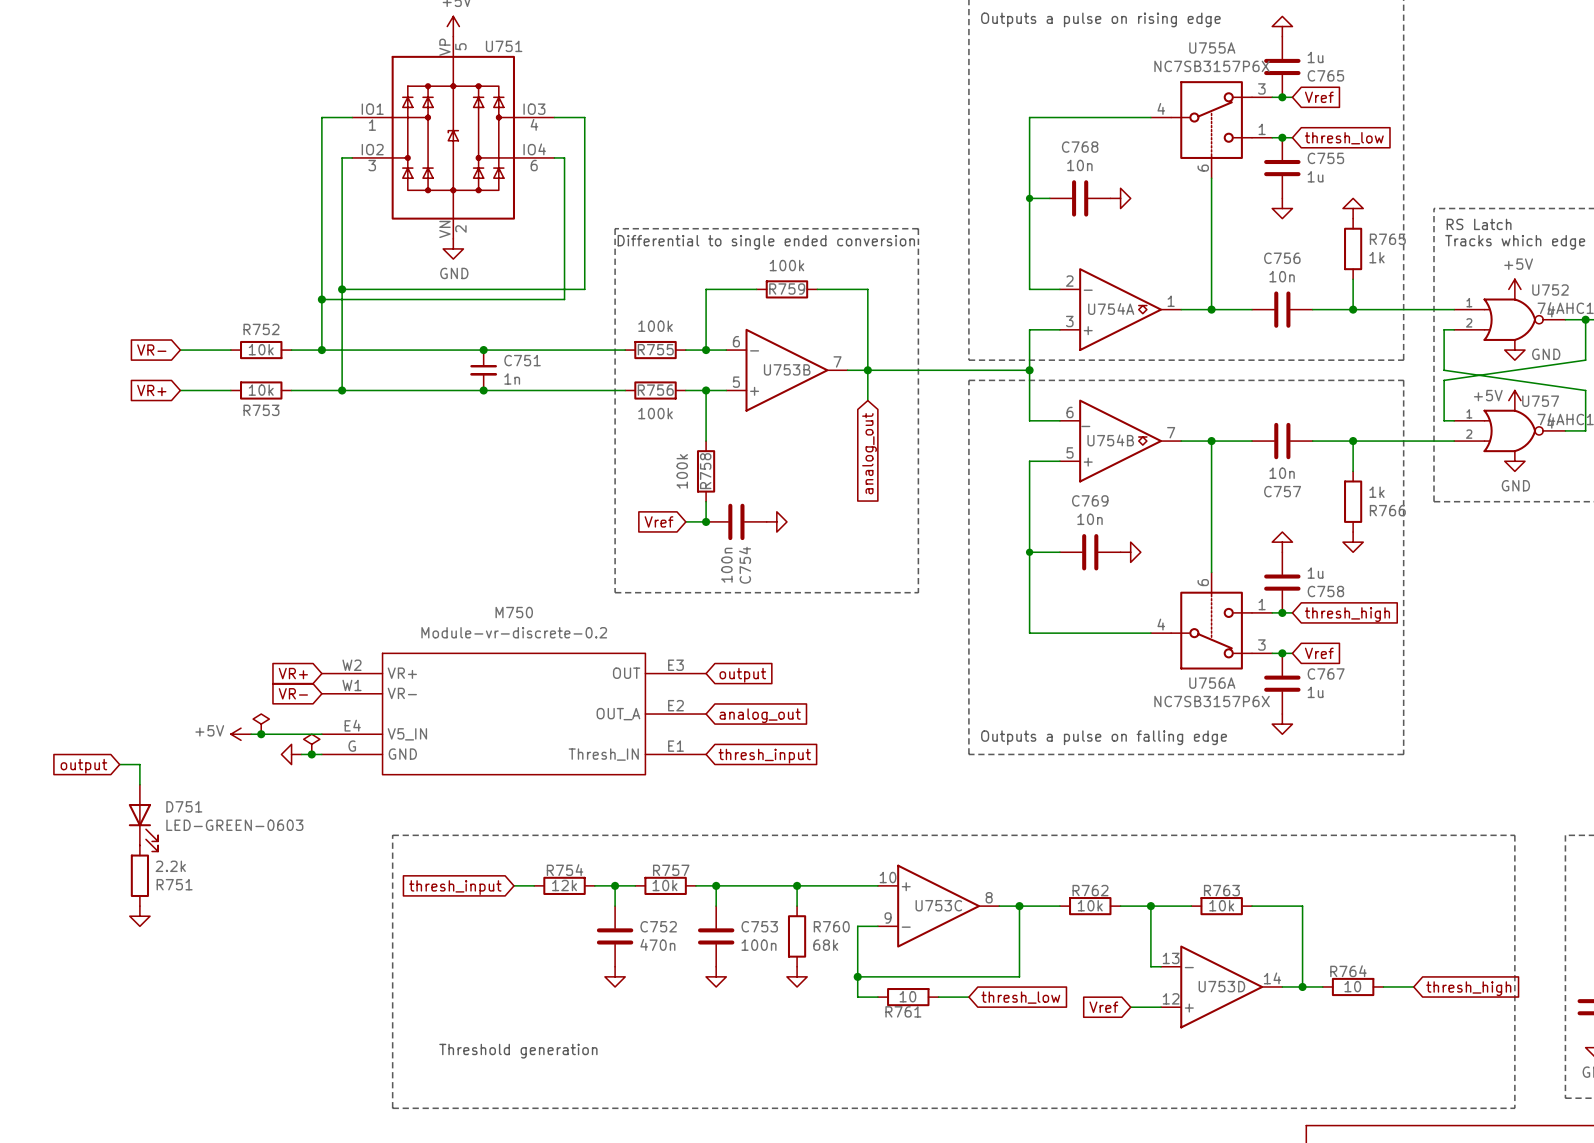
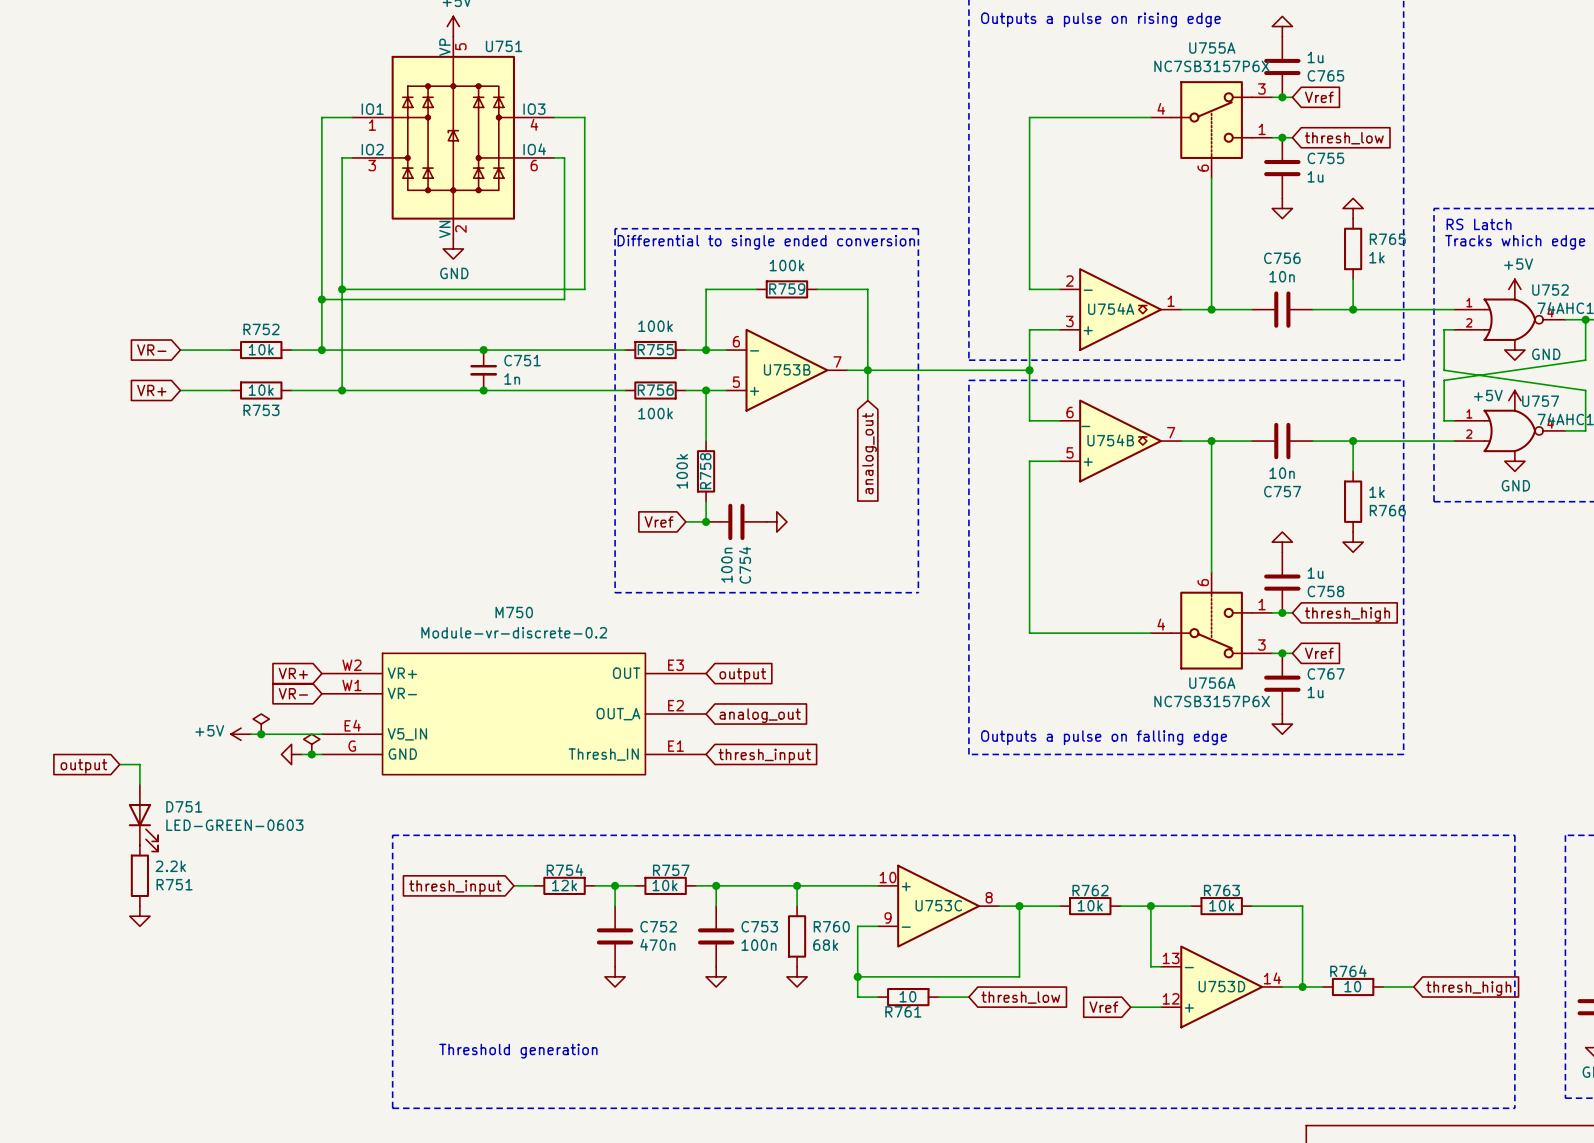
wire: (1029, 198) (1049, 198) -> none
junction: (1029, 198) -> none
C768: 10n (1080, 198) -> none
power symbol: (1120, 198) -> none
wire: (1029, 552) (1059, 552) -> none
junction: (1029, 552) -> none
C769: 10n (1090, 552) -> none
power symbol: (1130, 552) -> none

